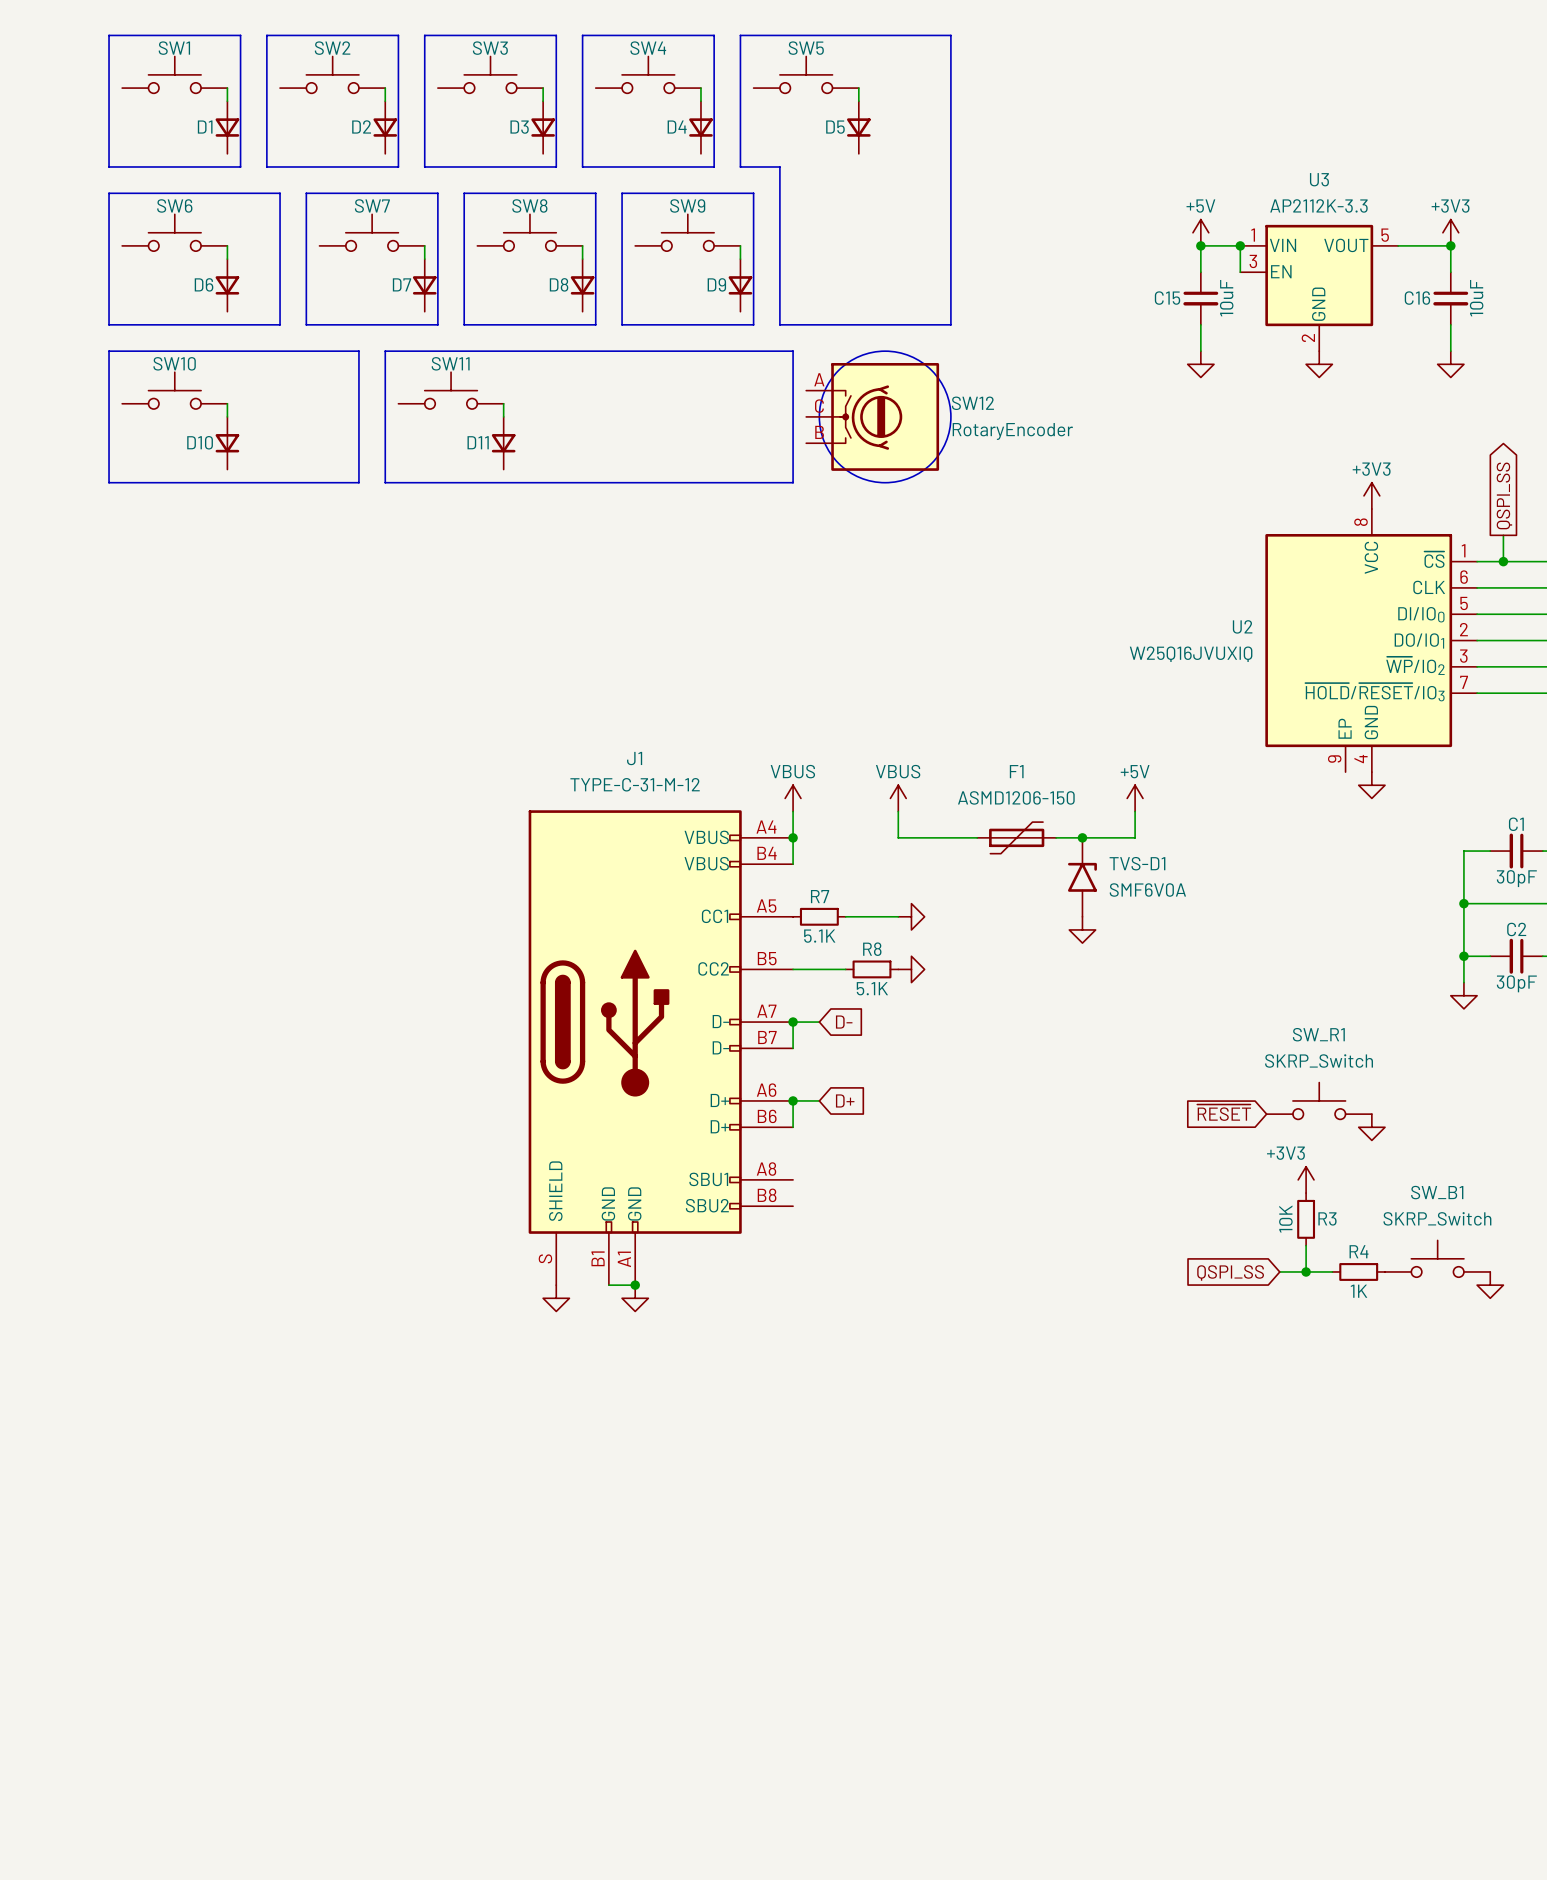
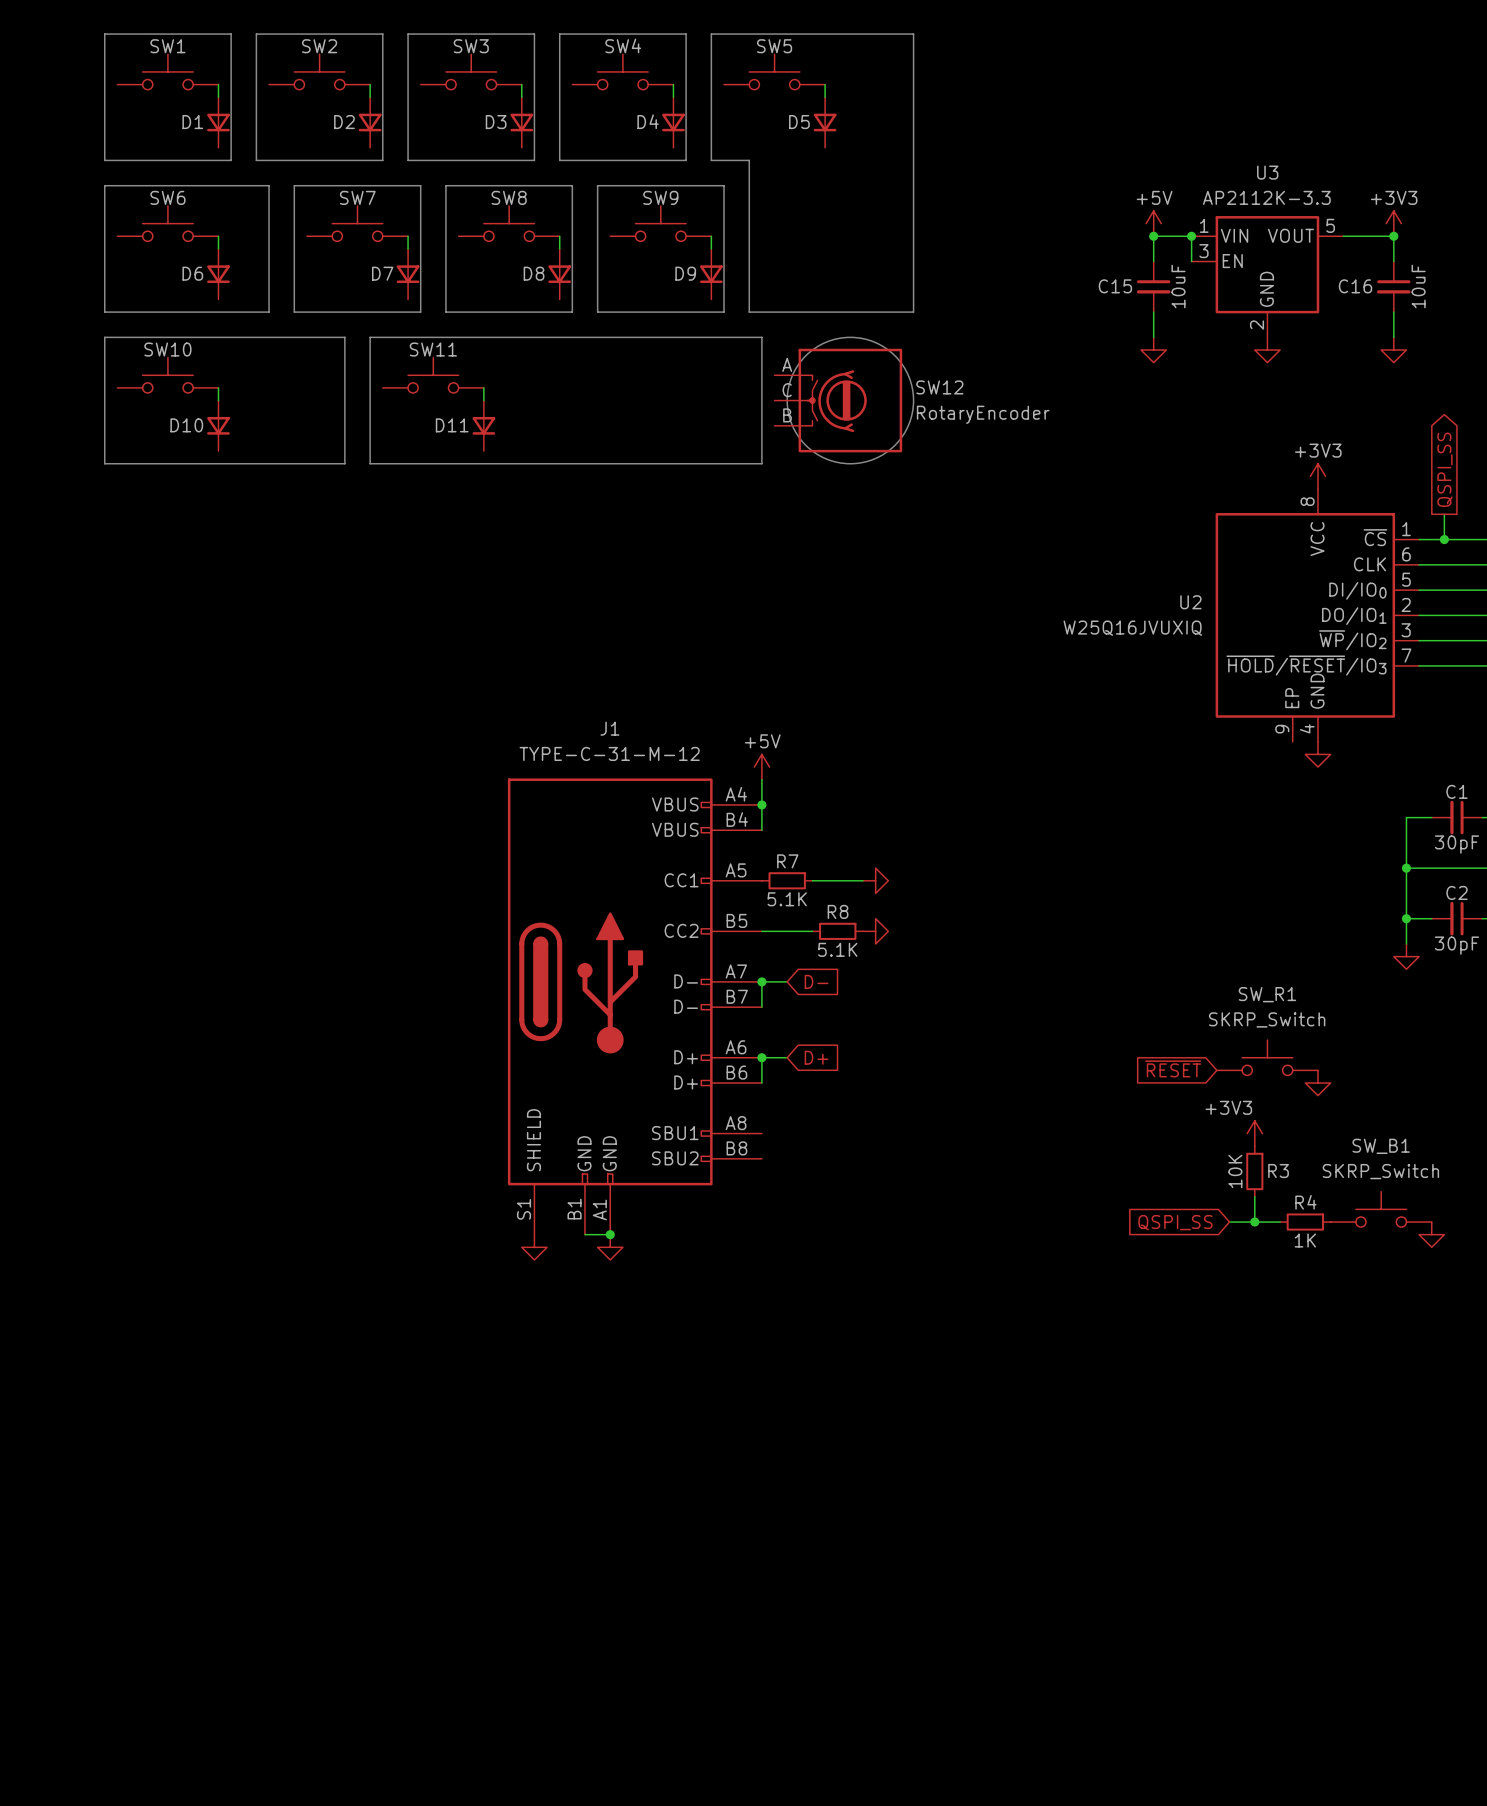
power symbol: VBUS (793, 798) -> +5V (761, 767)
power symbol: VBUS (898, 798) -> none
power symbol: +5V (1135, 798) -> none
wire: (898, 811) (898, 837) (977, 837) -> none
wire: (1135, 811) (1135, 837) (1056, 837) -> none
F1: ASMD1206-150 (1016, 837) -> none
junction: (1082, 837) -> none
TVS-D1: SMF6V0A (1082, 877) -> none
power symbol: (1082, 929) -> none
J1 pin number: S (545, 1258) -> S1 (524, 1209)

